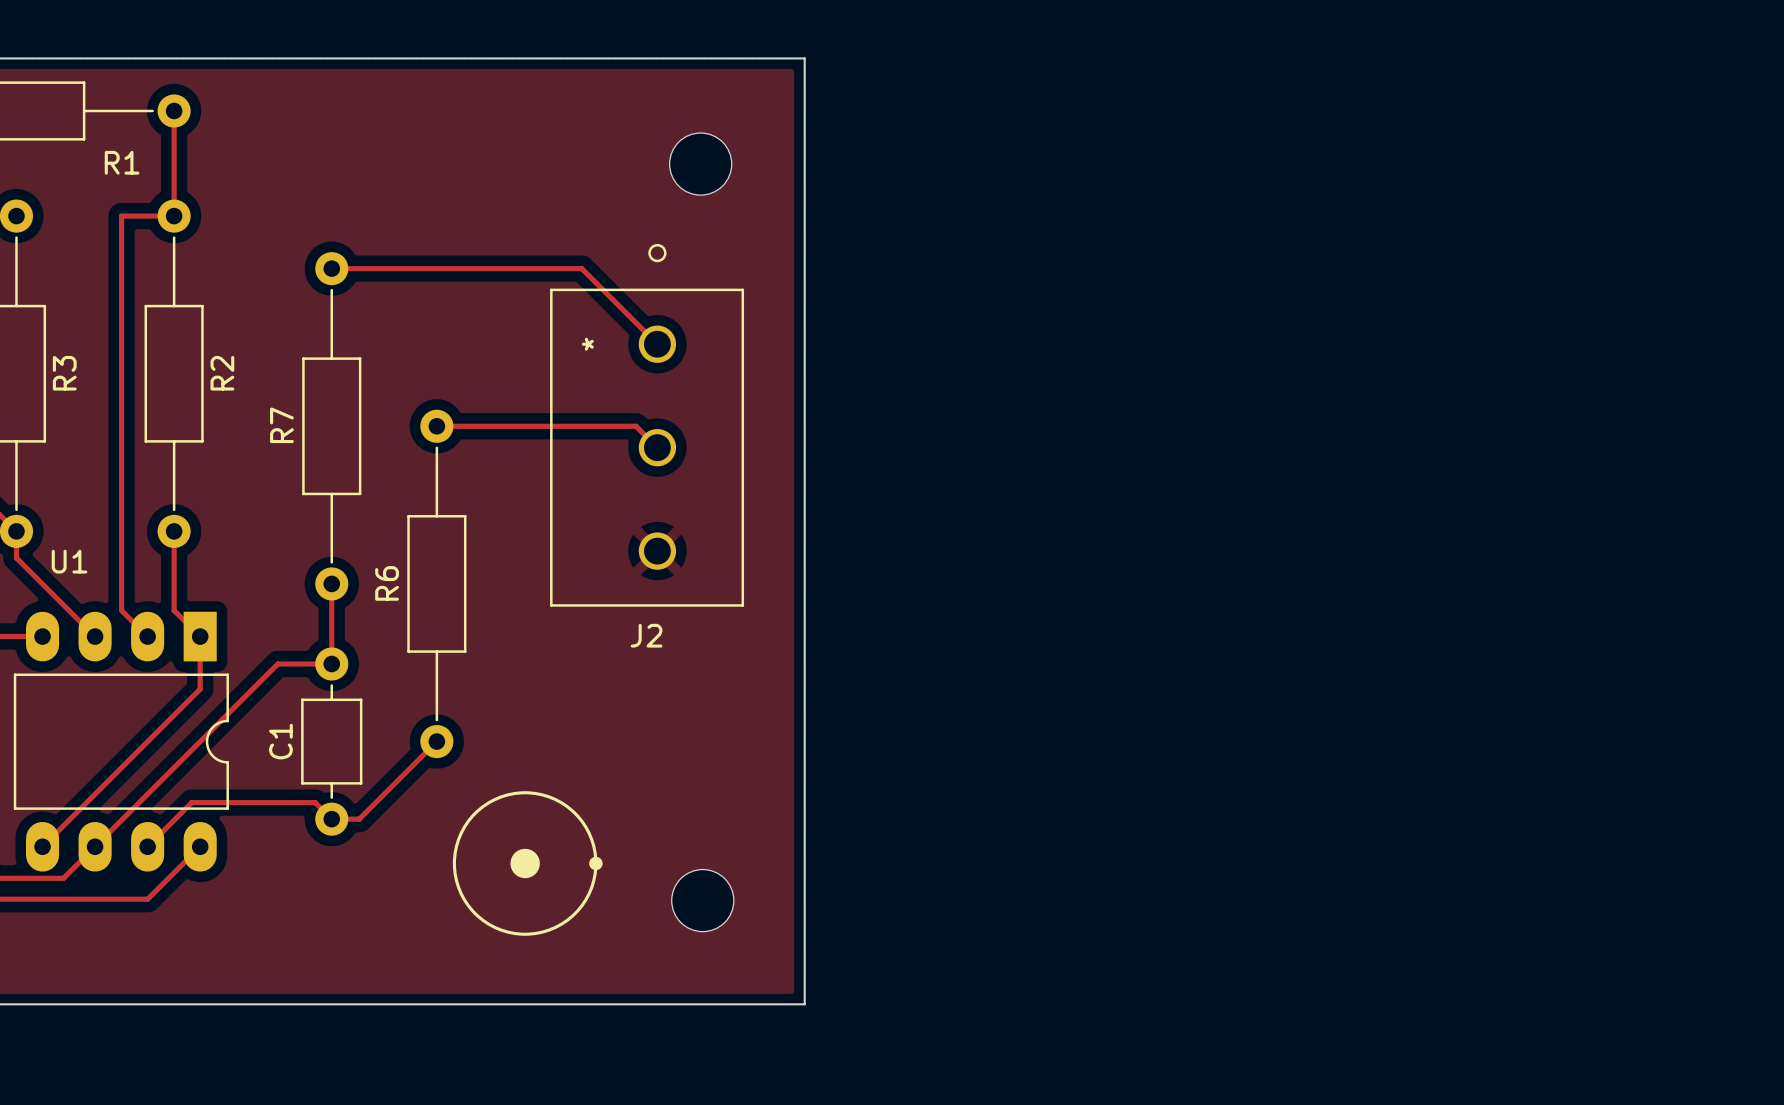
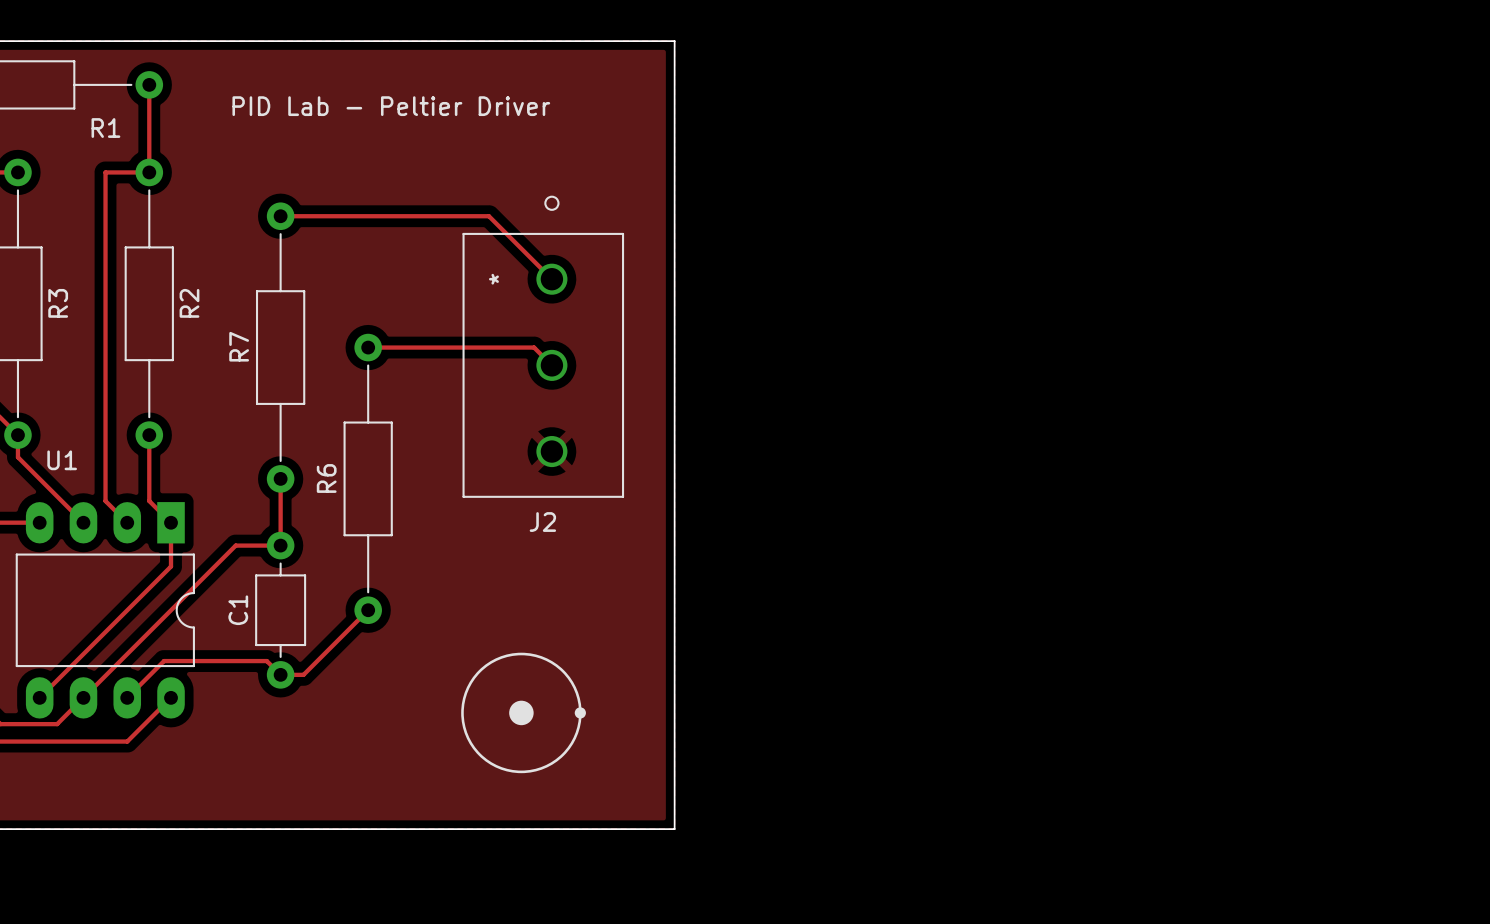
text: none -> PID Lab - Peltier Driver (391, 106)
part: (700, 164) -> none
drawing position: (525, 863) -> (521, 712)
drawing position: (525, 863) -> (521, 712)
drawing position: (595, 863) -> (580, 712)
part: (702, 900) -> none

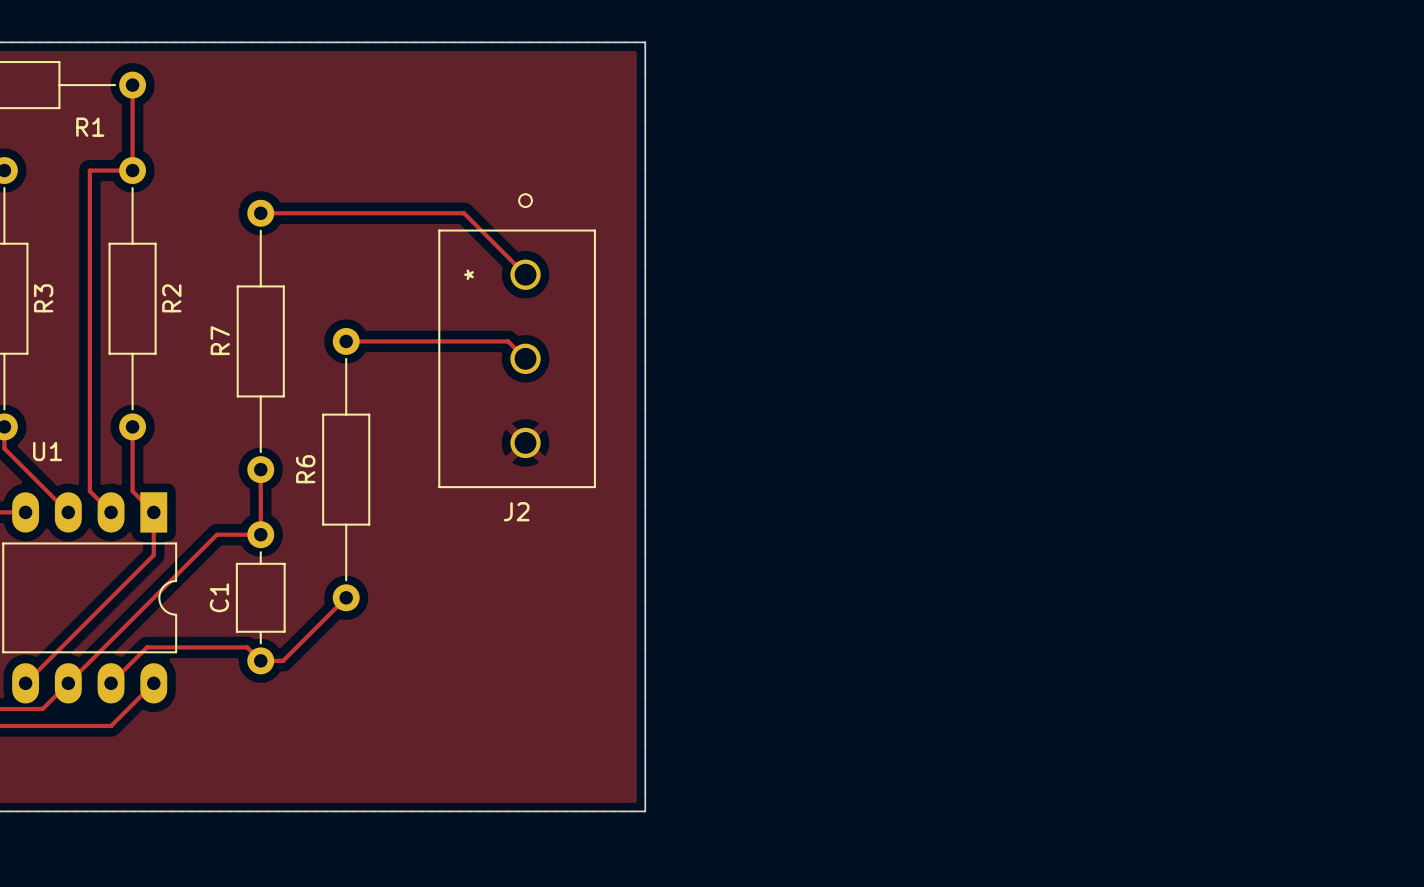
text: PID Lab - Peltier Driver (391, 106) -> none
drawing: [461, 652, 586, 774] -> none

